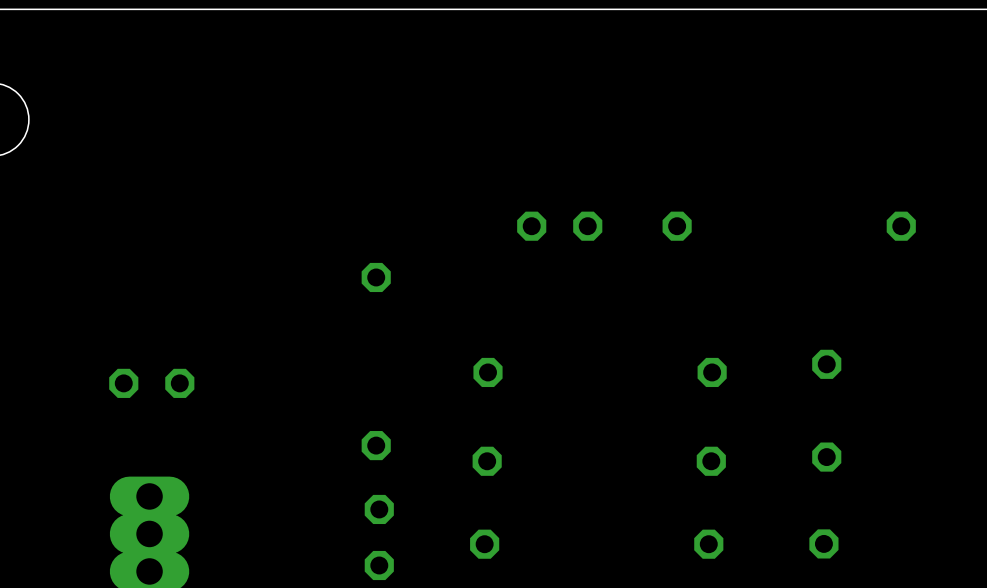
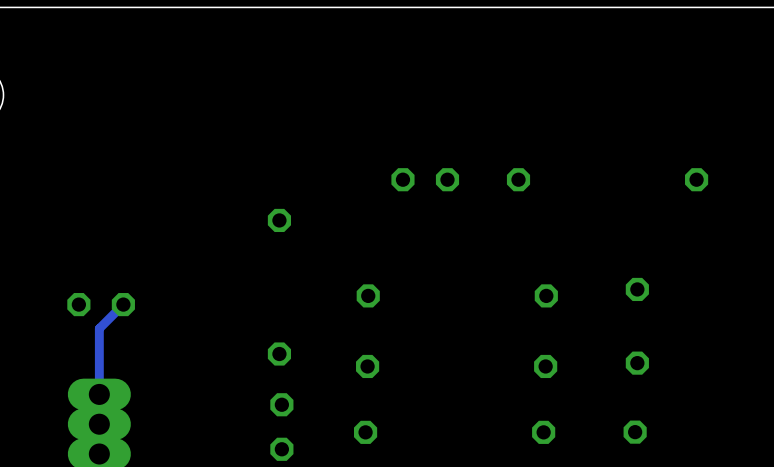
track: none -> (123, 304) (99, 328) (99, 394)

